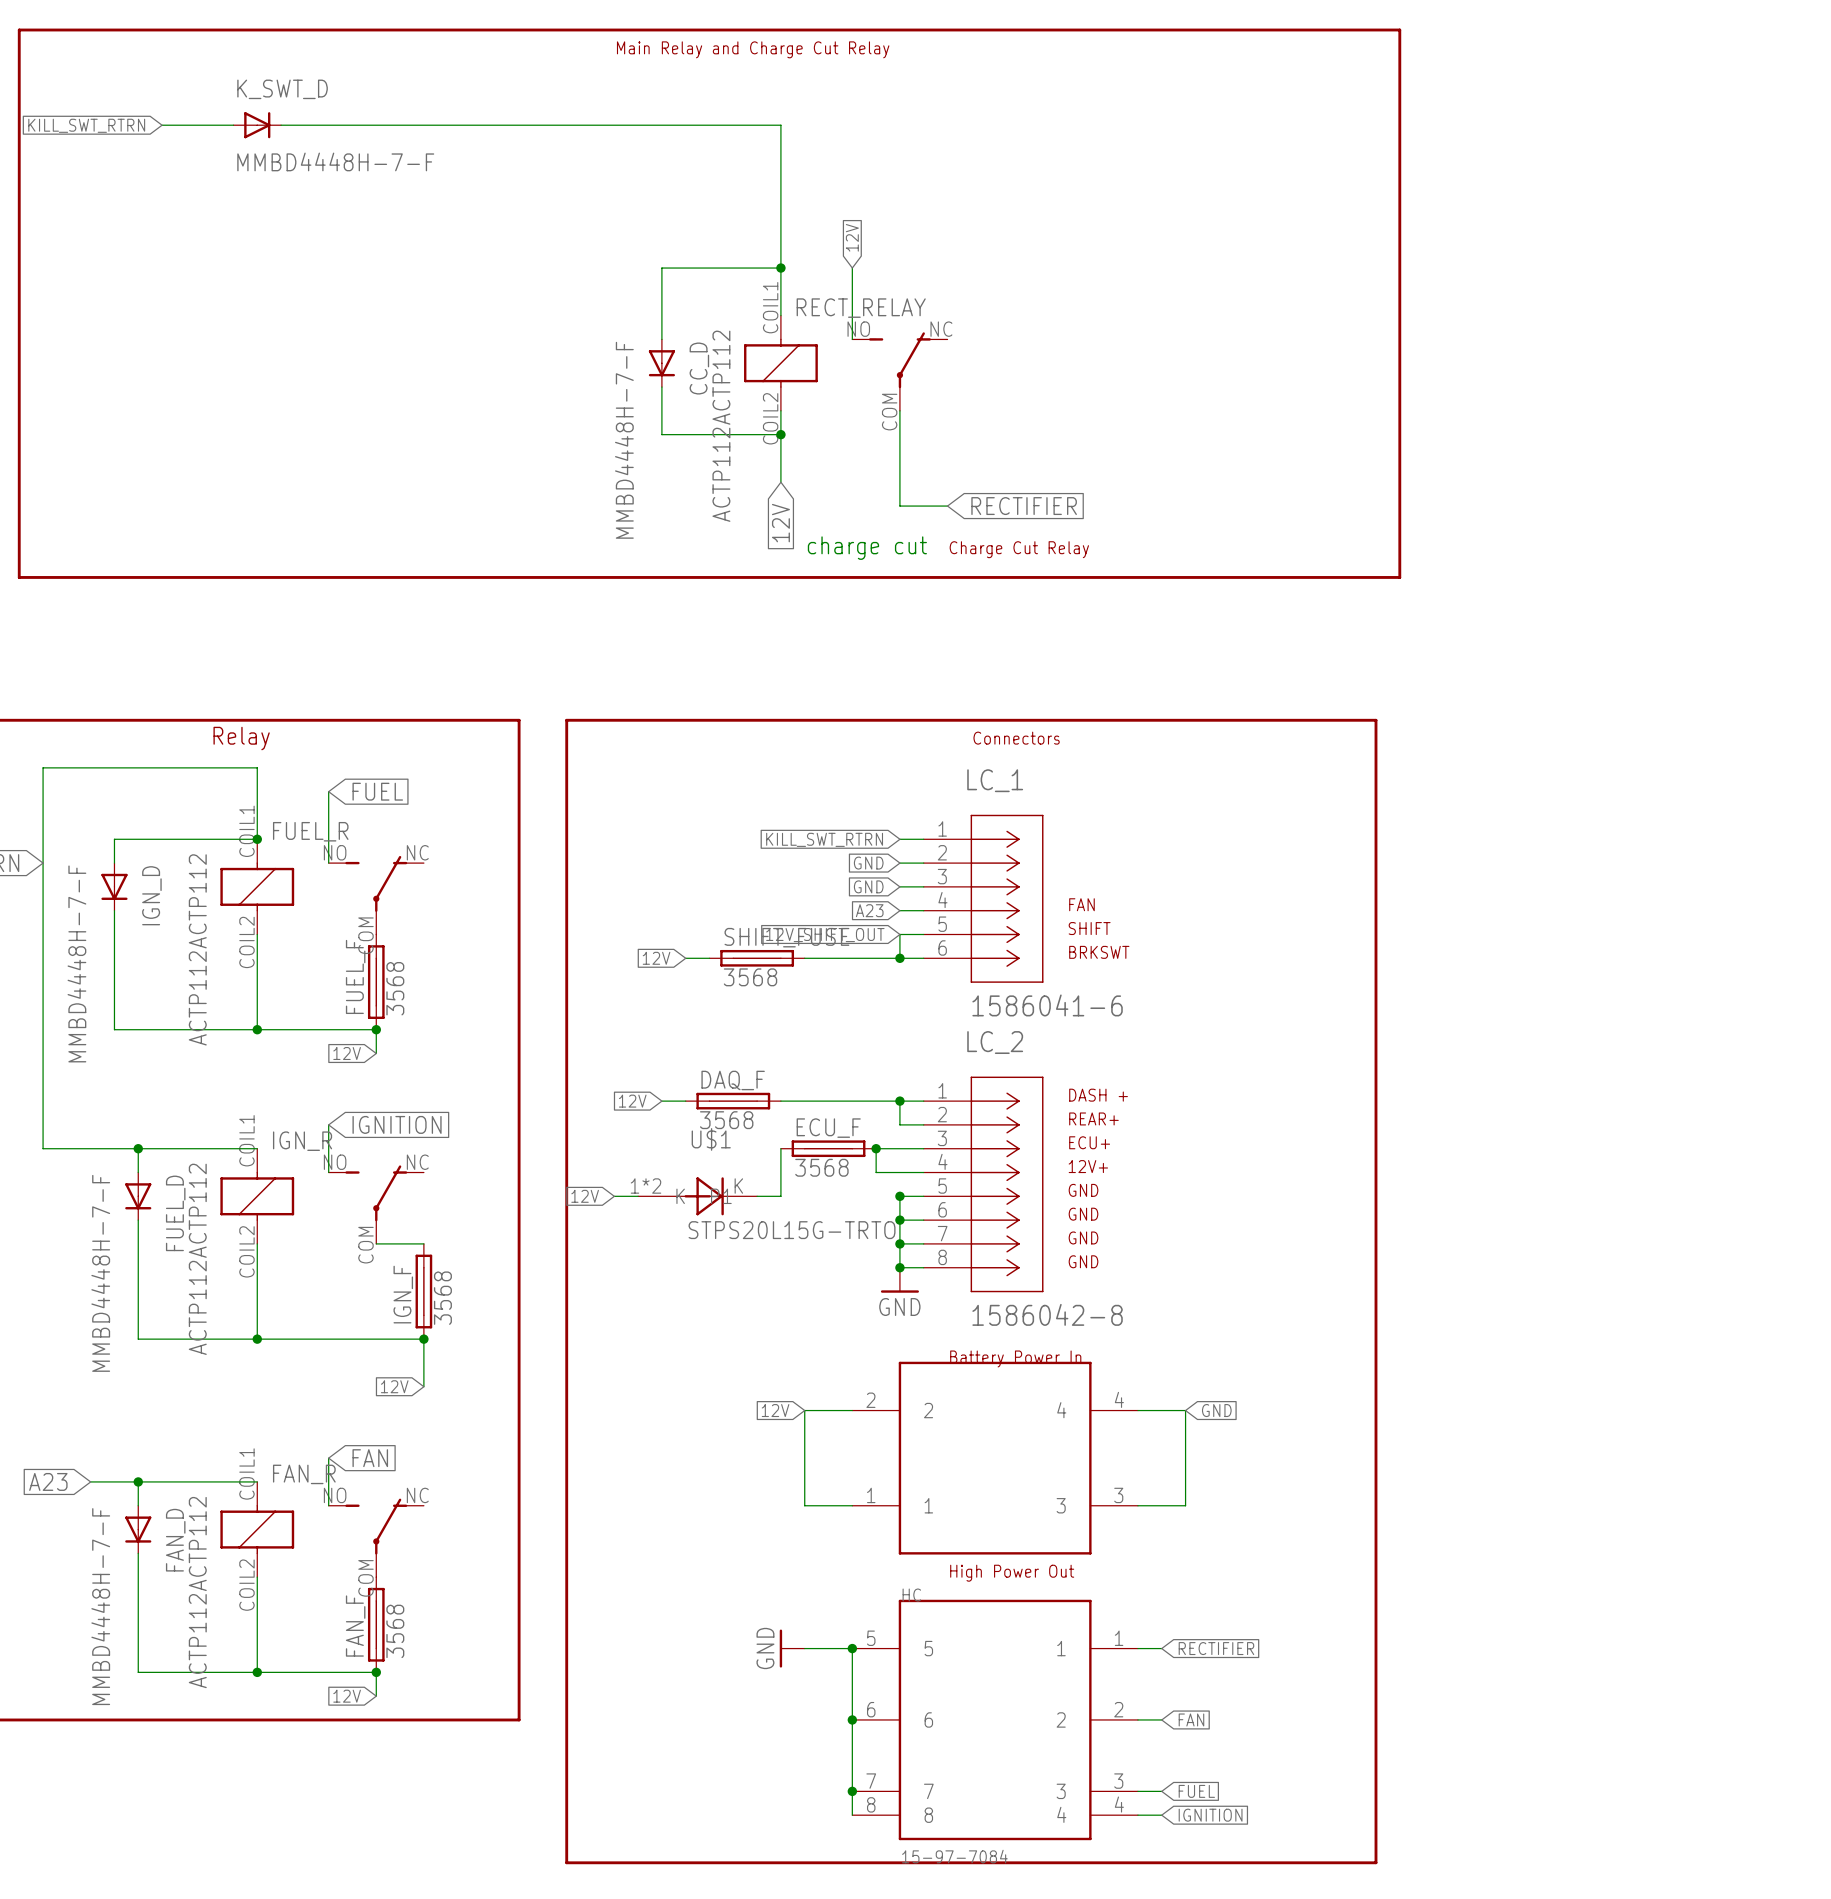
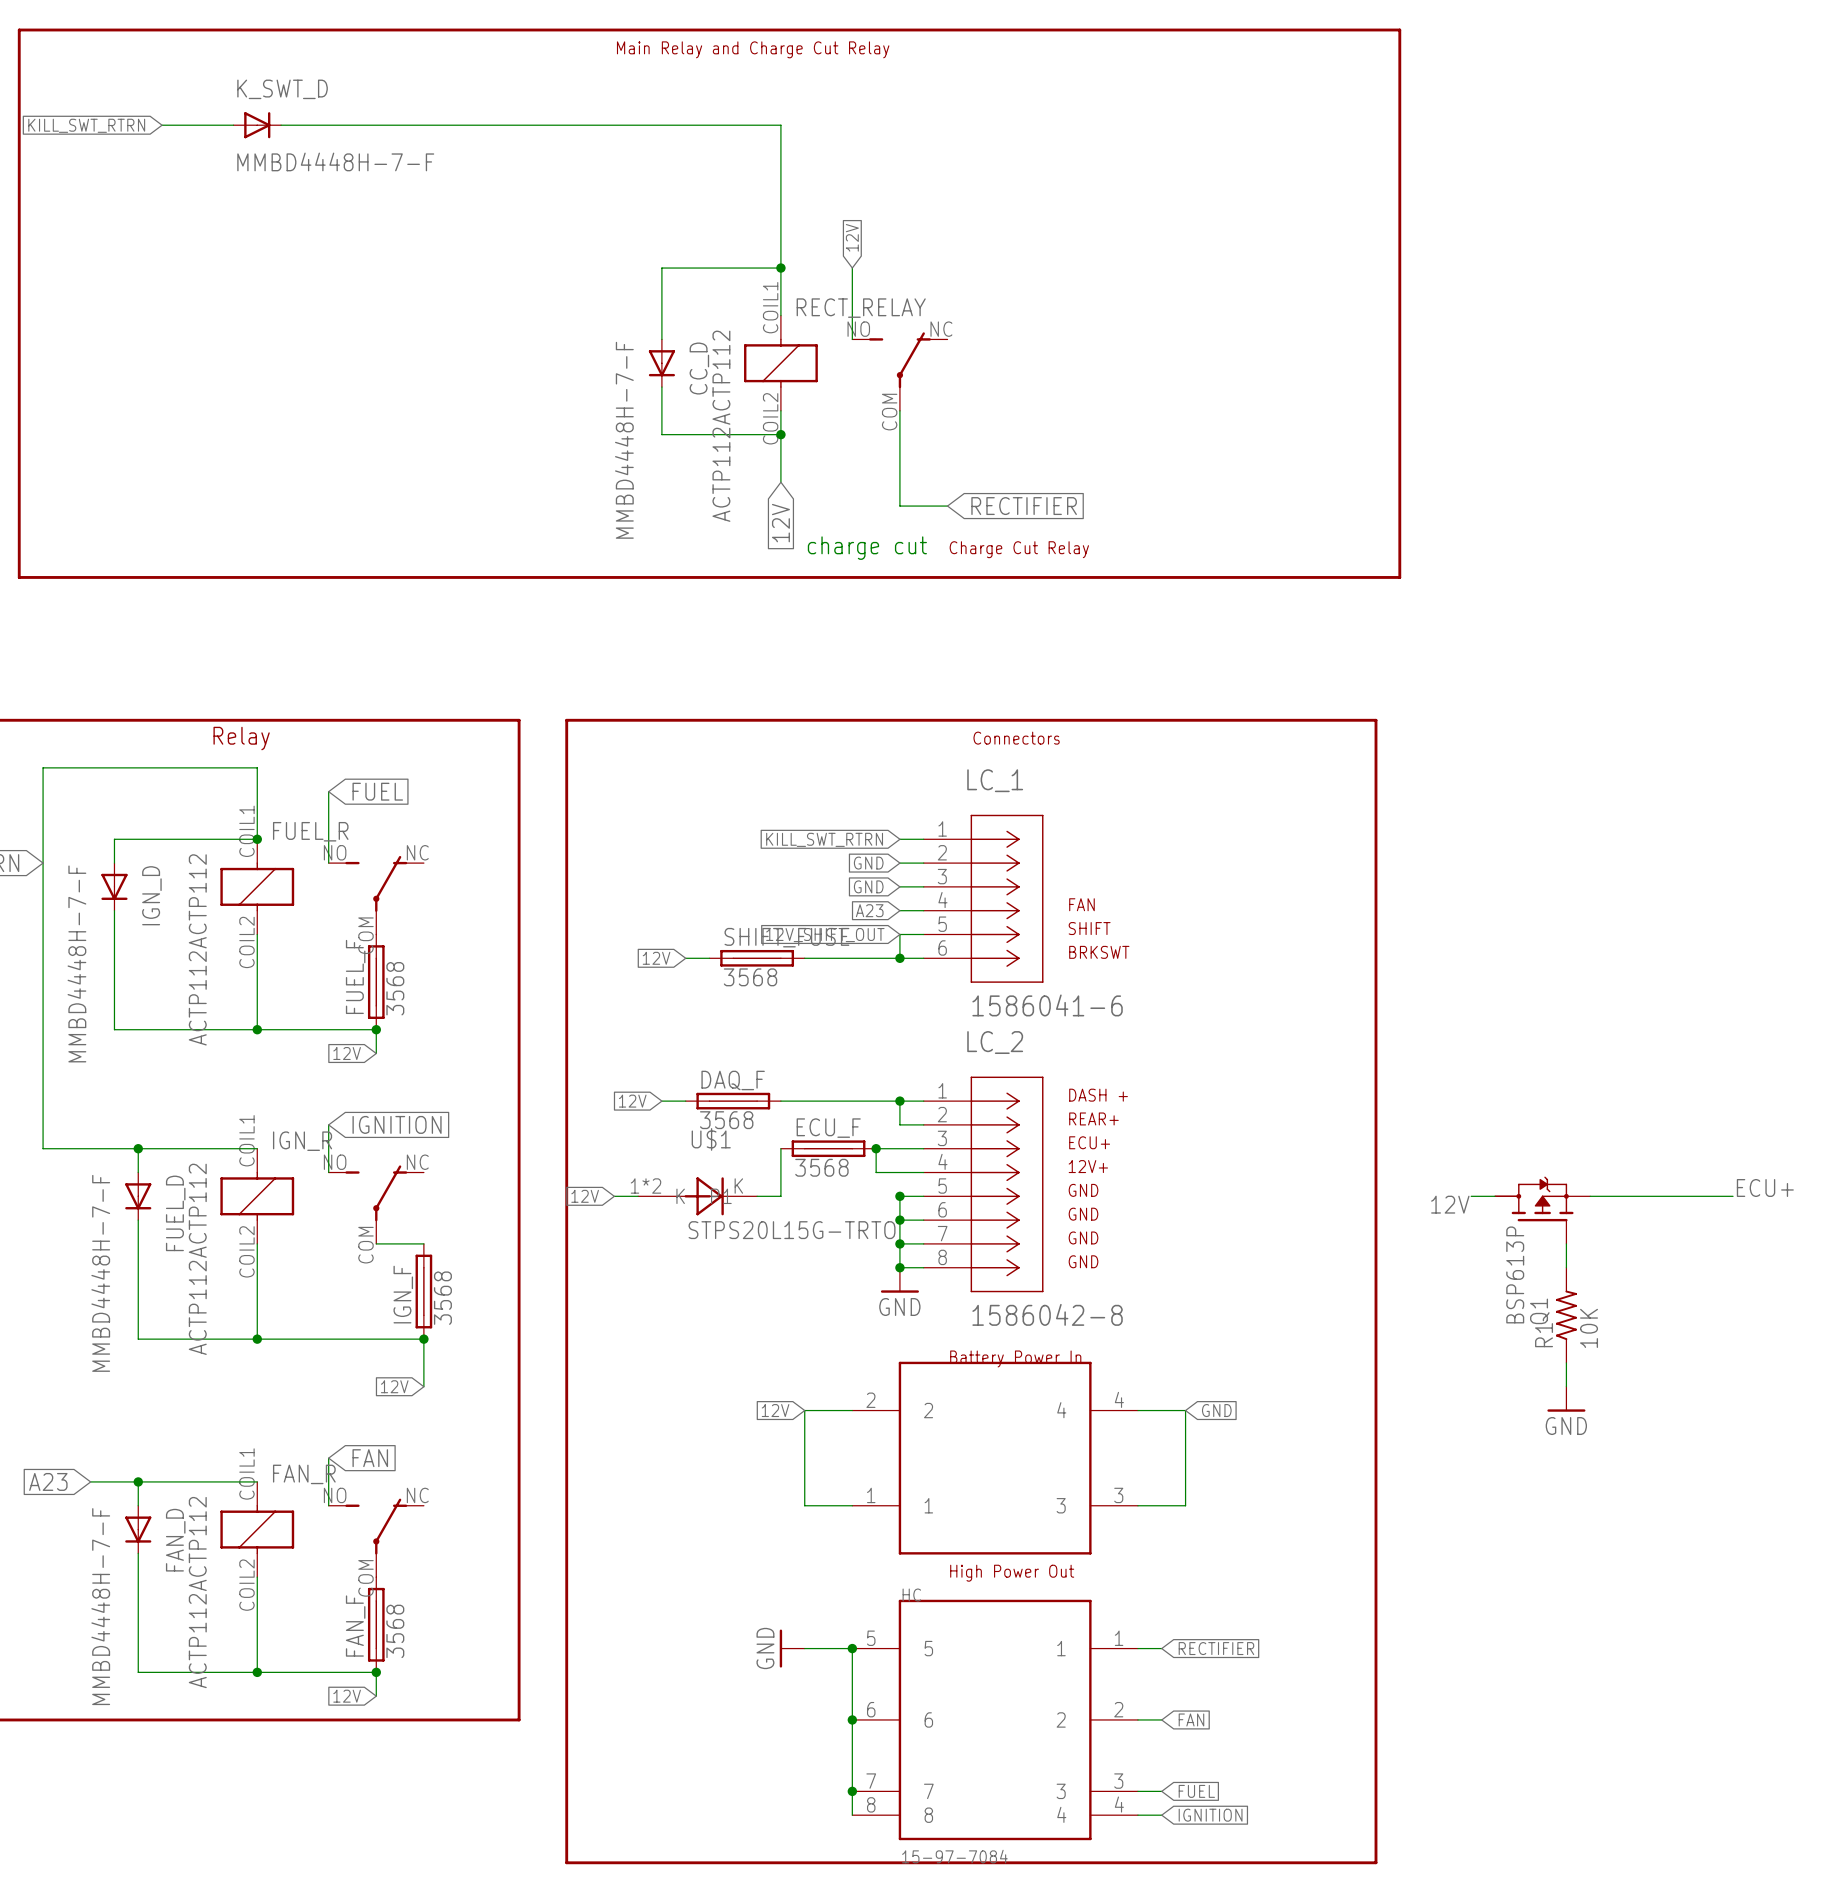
label: none -> ECU+ (1765, 1187)
wire: none -> (1471, 1196) (1495, 1196)
wire: none -> (1590, 1196) (1733, 1196)
label: none -> 12V (1450, 1204)
Q1: none -> BSP613P (1542, 1210)
wire: none -> (1566, 1243) (1566, 1267)
R1: none -> 10K (1566, 1315)
wire: none -> (1566, 1362) (1566, 1386)
power symbol: none -> GND (1566, 1399)

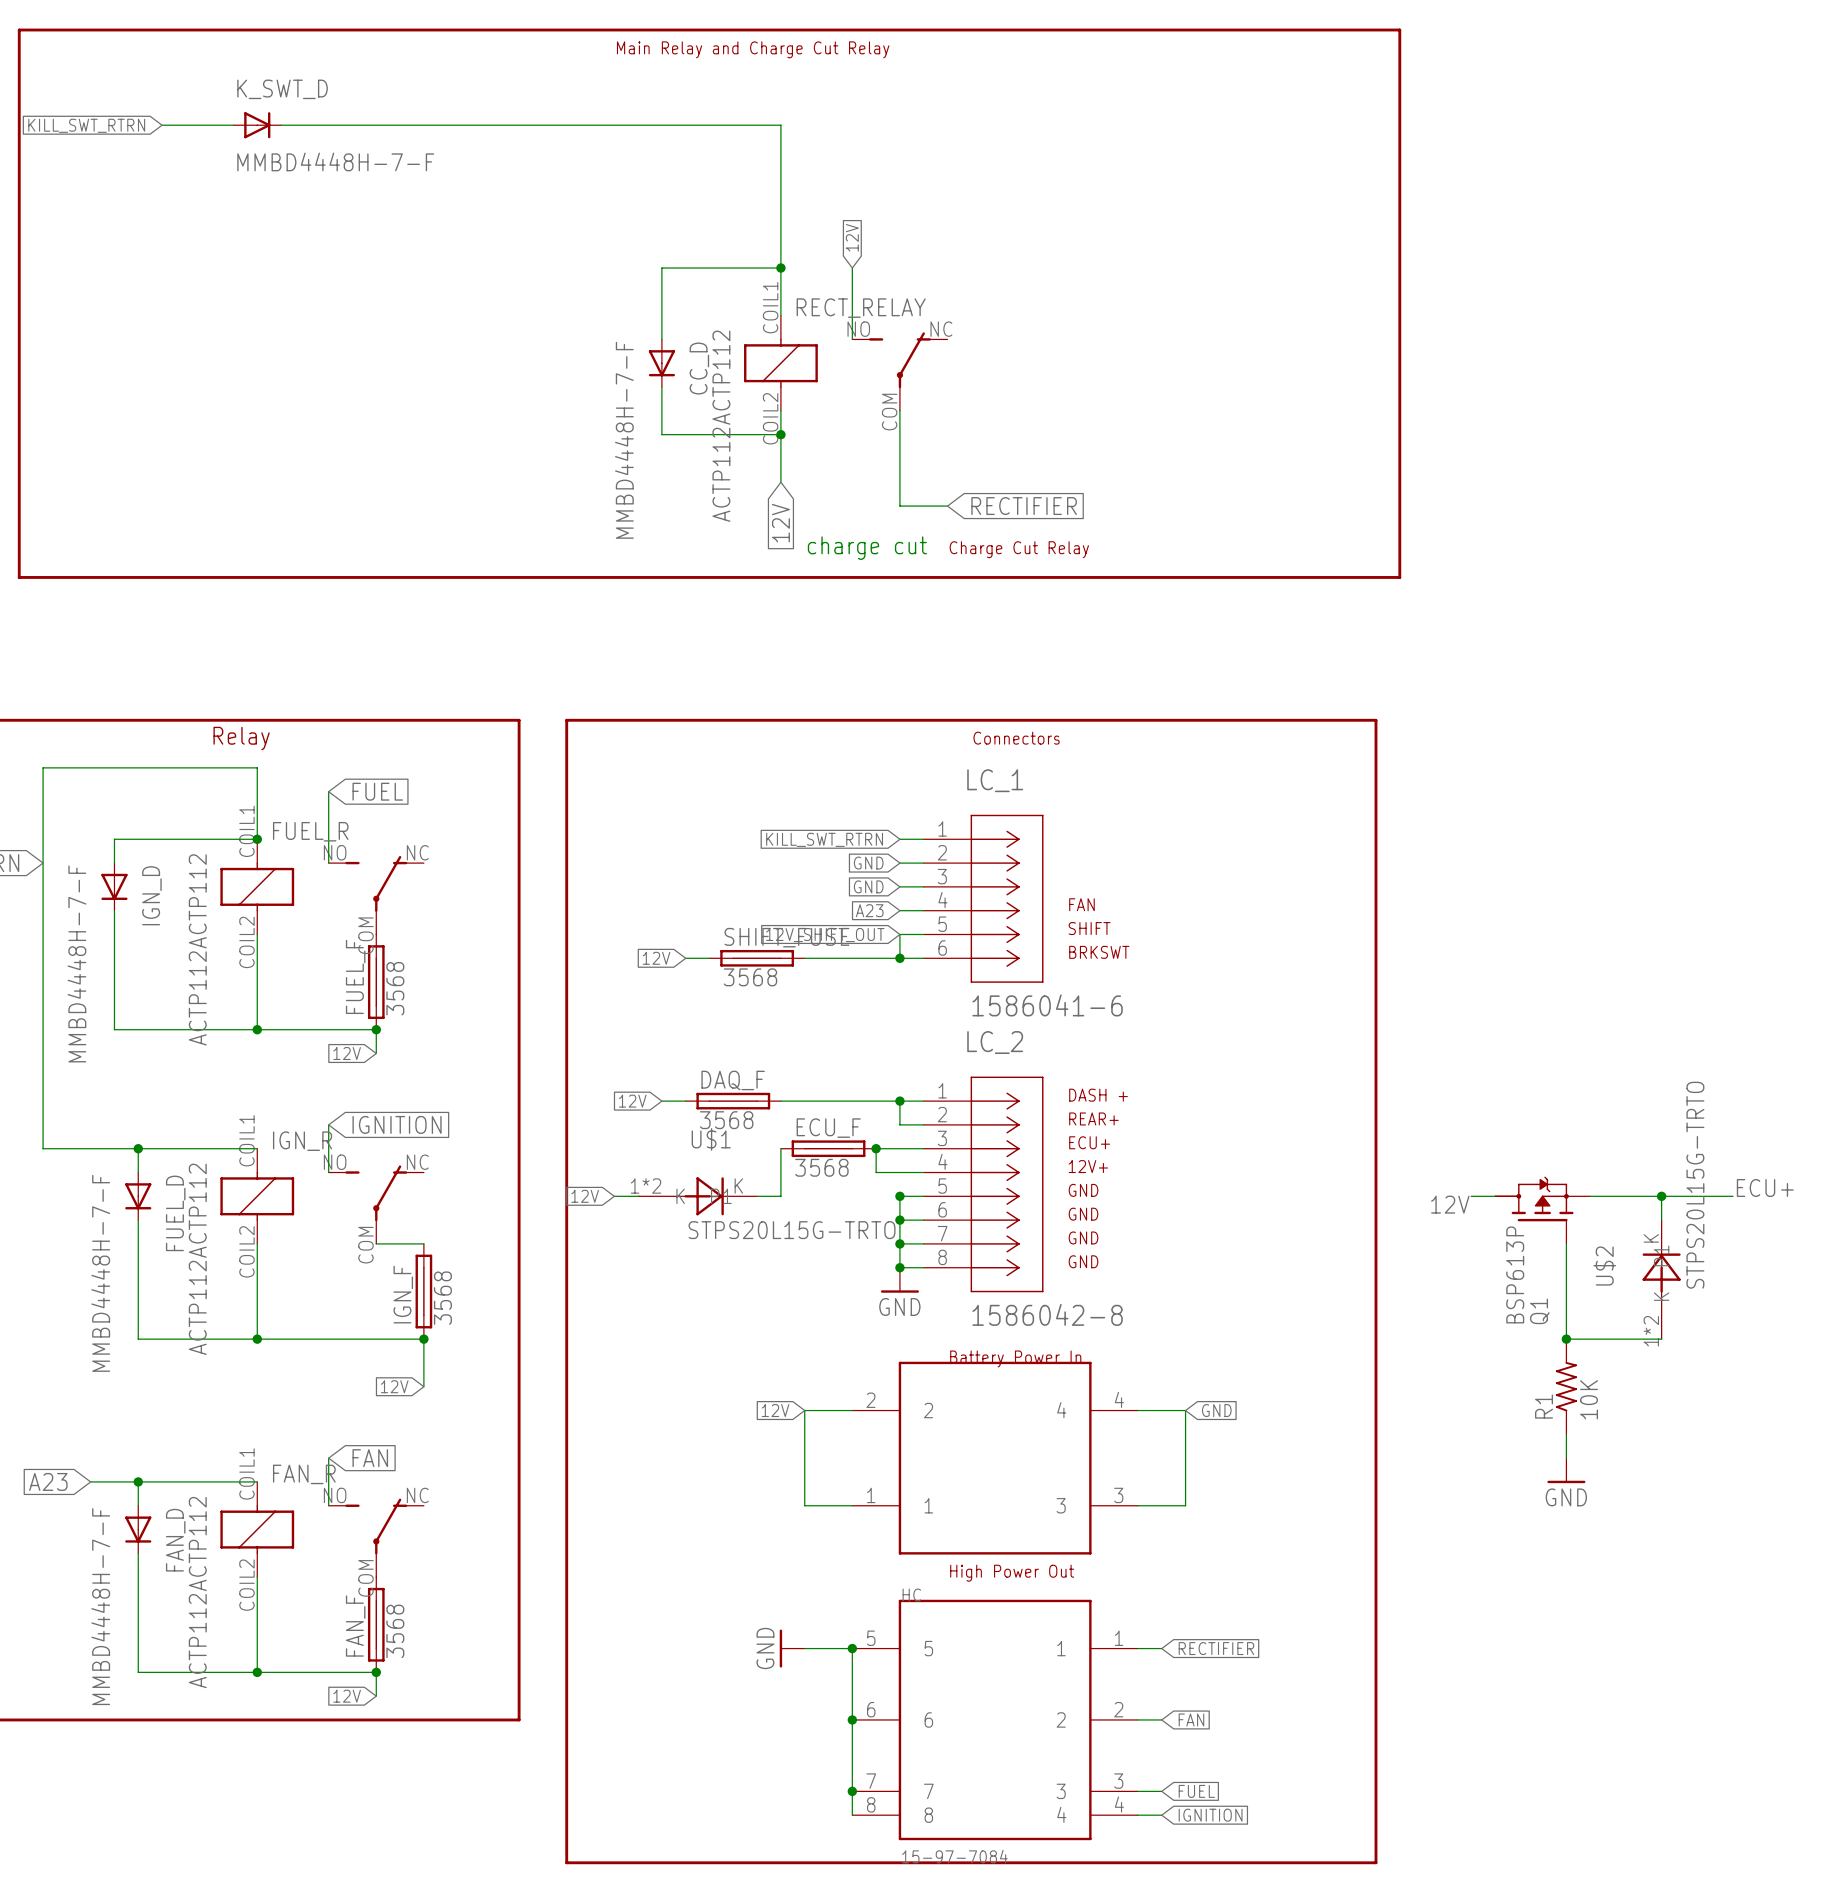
wire: none -> (1661, 1196) (1661, 1220)
junction: none -> (1661, 1196)
wire: none -> (1566, 1267) (1566, 1339) (1661, 1339)
U$2: none -> STPS20L15G-TRTO (1661, 1279)
R1 position: (1566, 1315) -> (1566, 1386)
junction: none -> (1566, 1339)
wire: (1566, 1362) (1566, 1386) -> (1566, 1434) (1566, 1458)
power symbol position: GND (1566, 1399) -> GND (1566, 1470)

